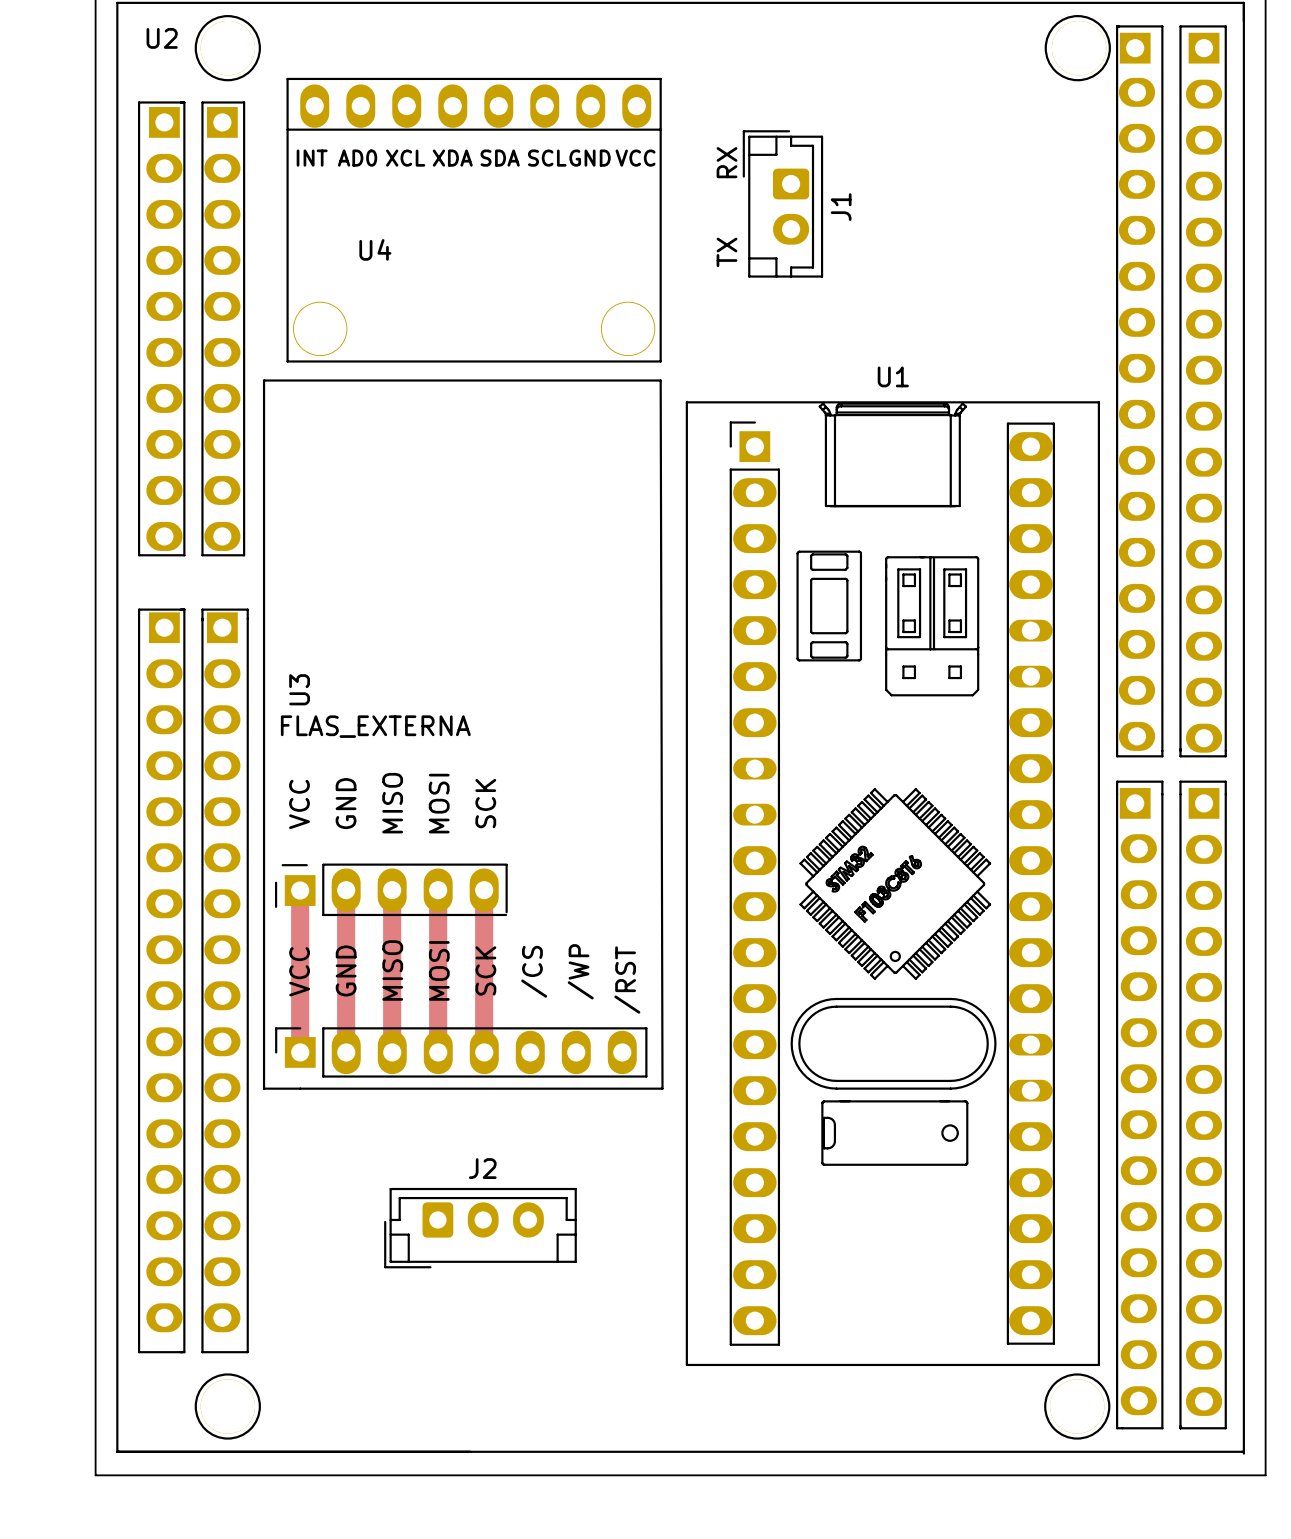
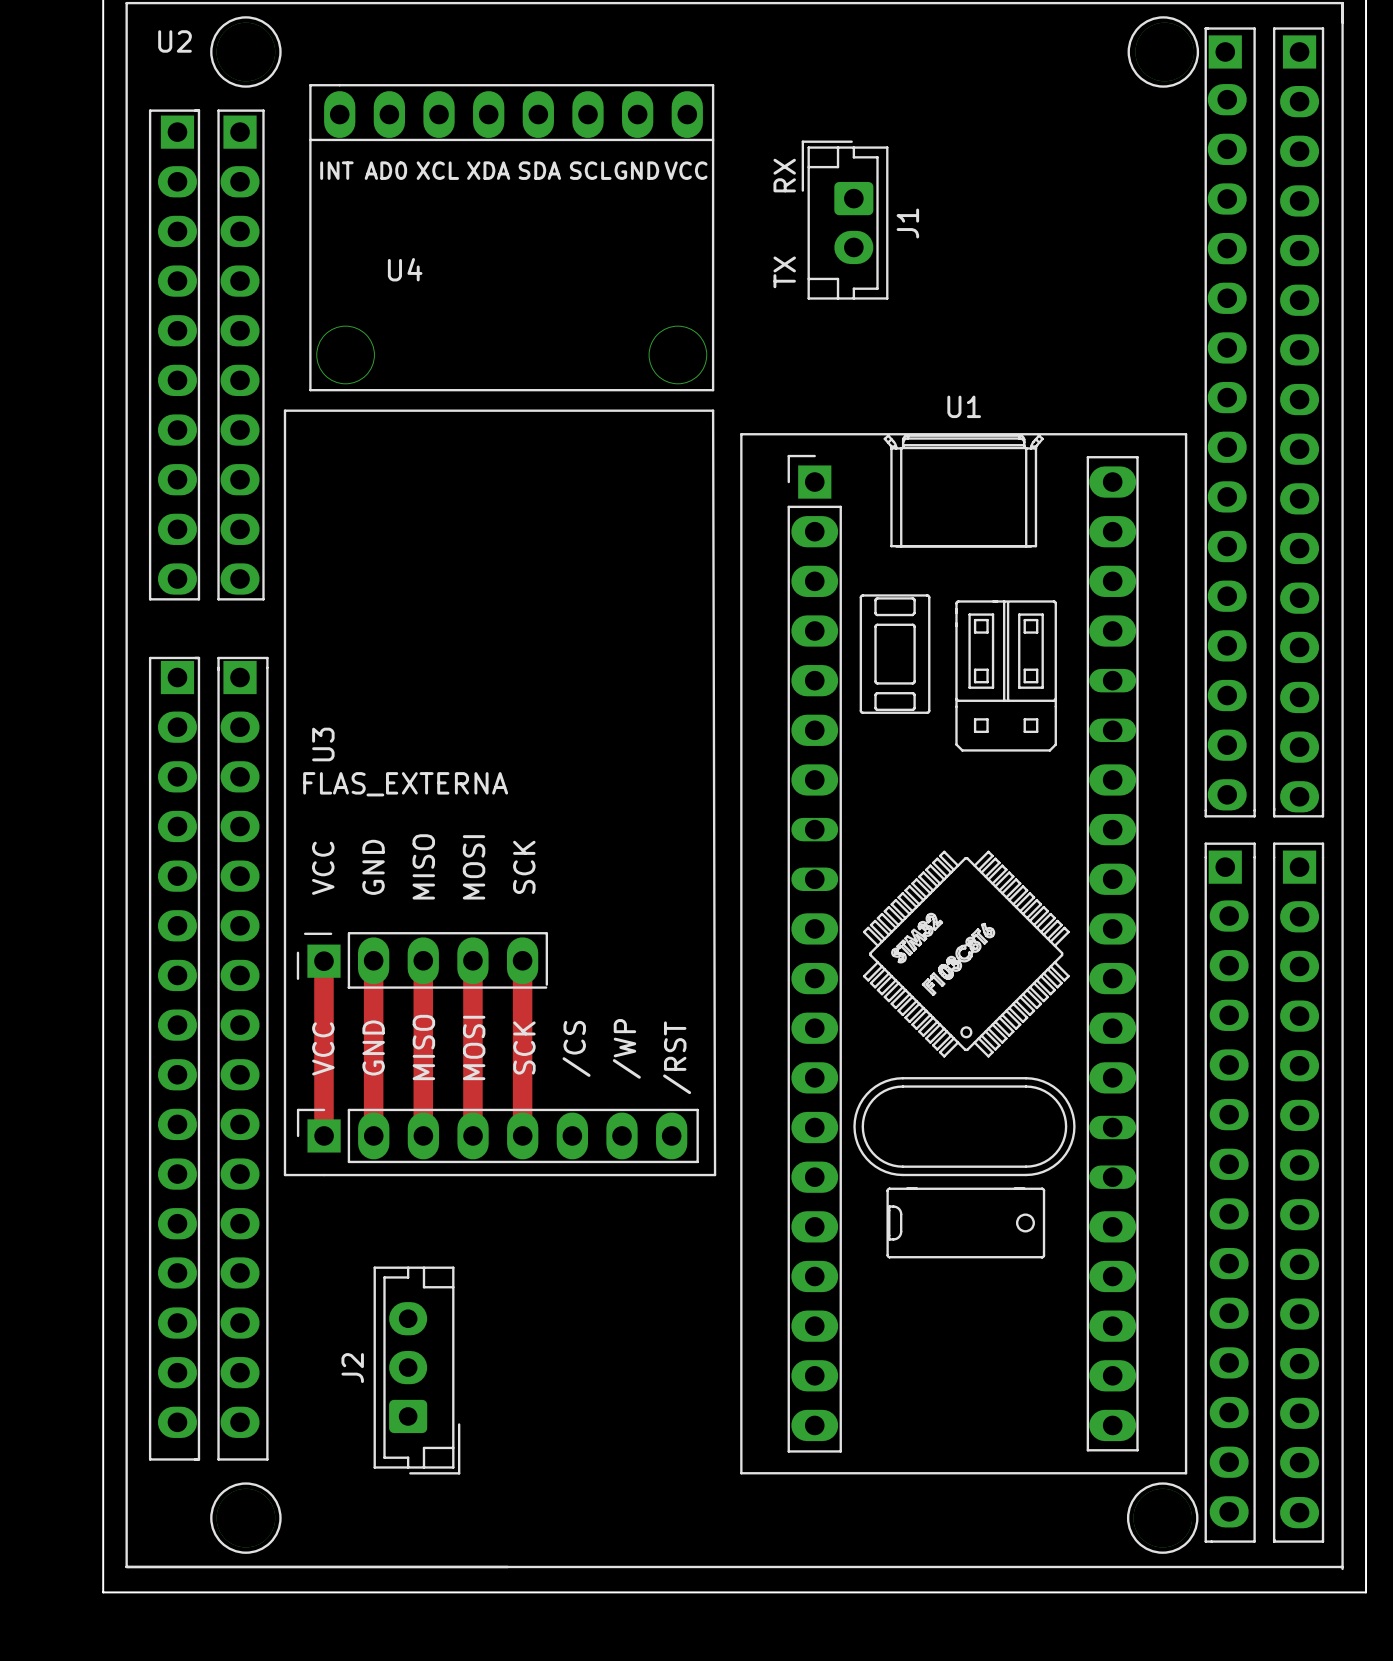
J2 rotation: 0° (480, 1228) -> 90° counterclockwise (416, 1370)

